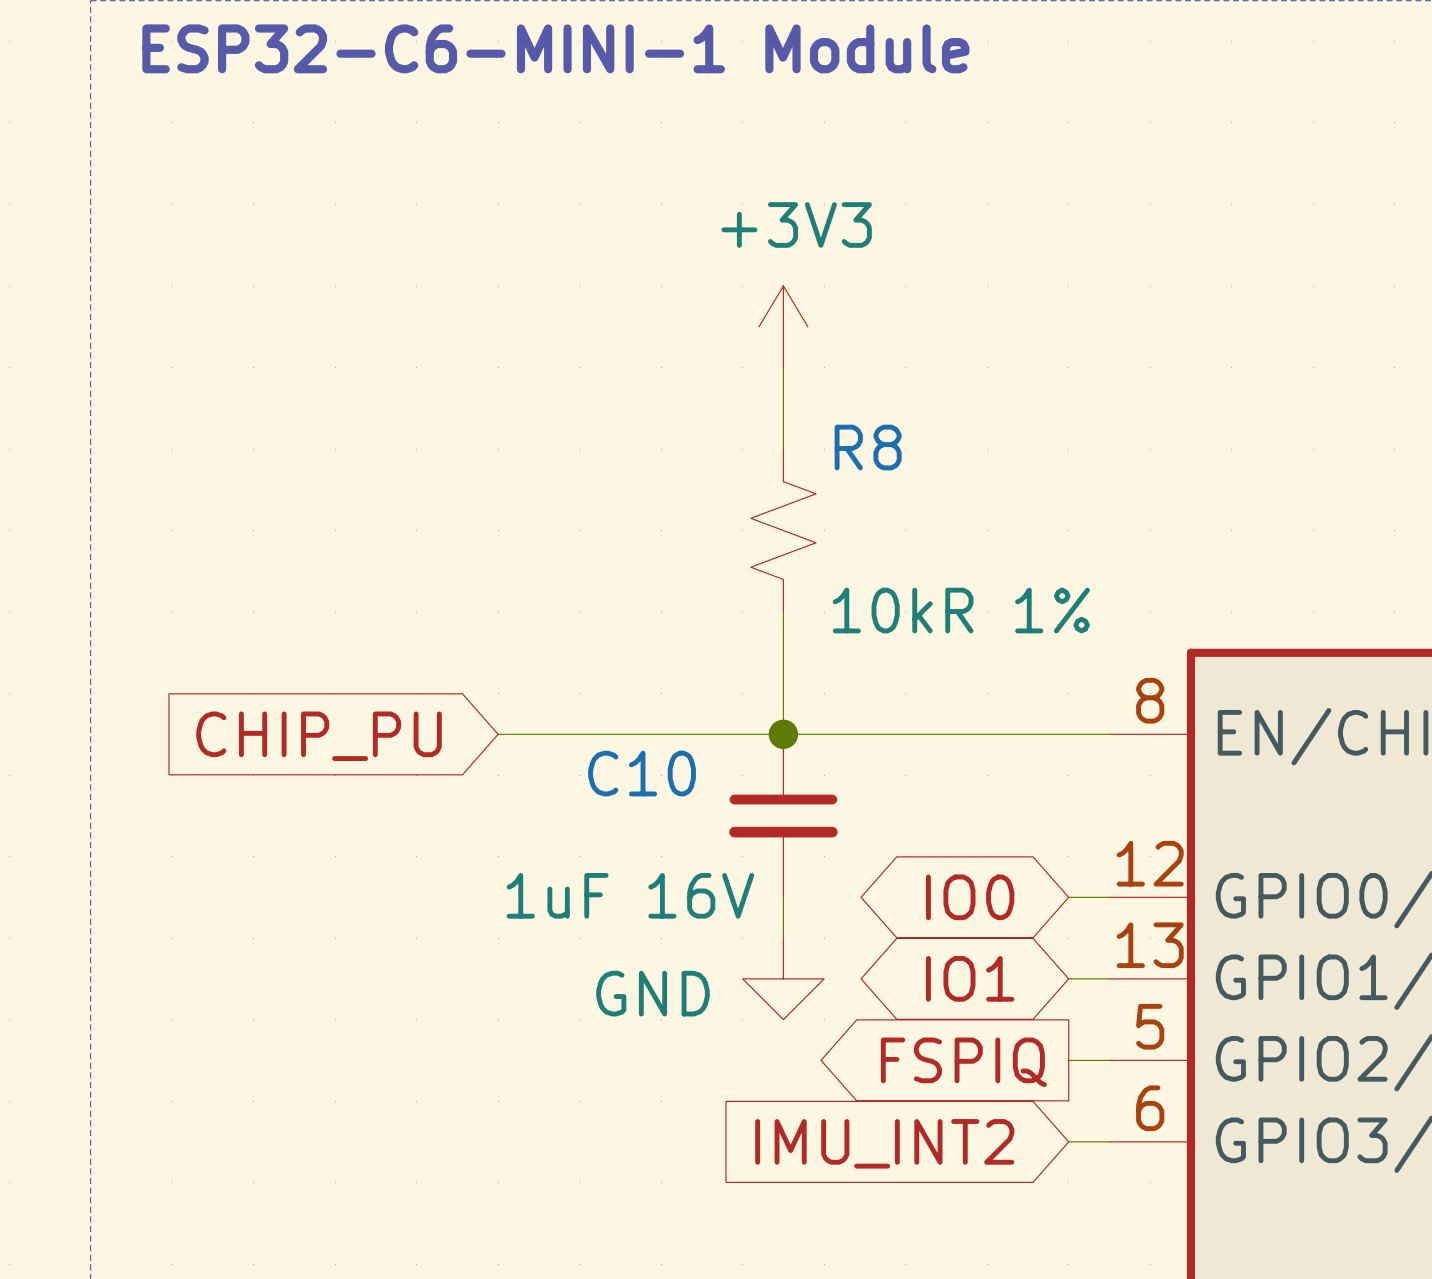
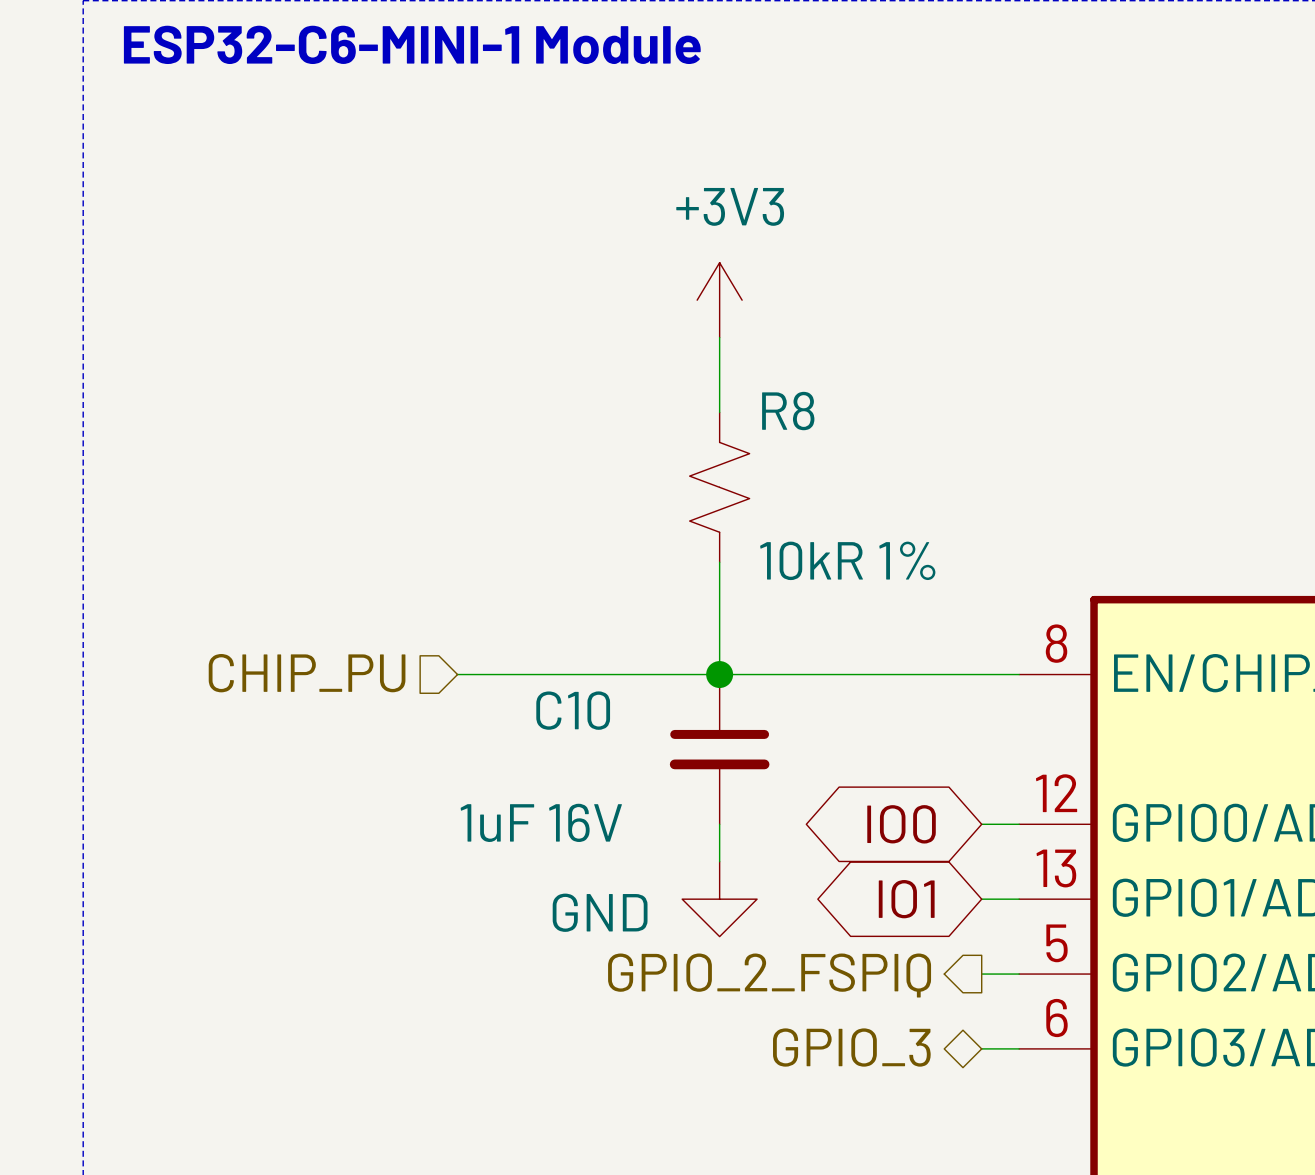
hierarchical label: none -> CHIP_PU (307, 673)
global label: CHIP_PU (319, 736) -> none
hierarchical label: none -> GPIO_2_FSPIQ (769, 975)
global label: FSPIQ (963, 1062) -> none
hierarchical label: none -> GPIO_3 (851, 1047)
global label: IMU_INT2 (884, 1143) -> none

